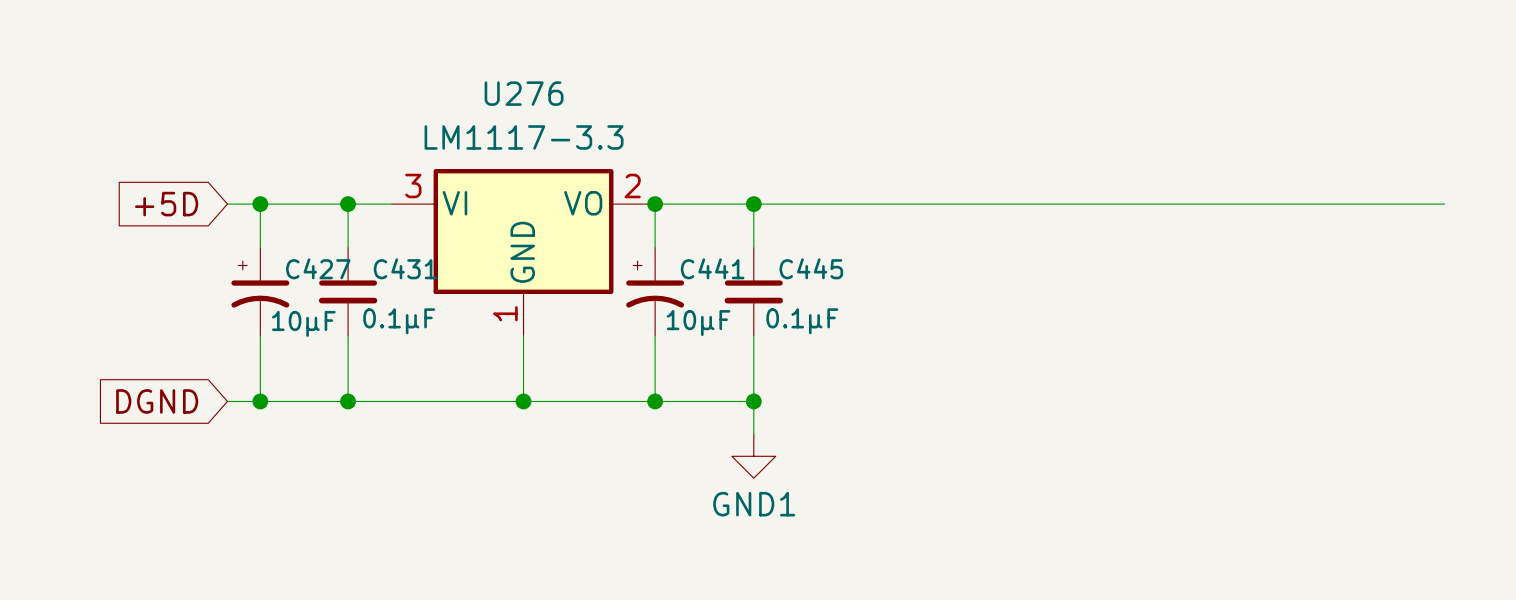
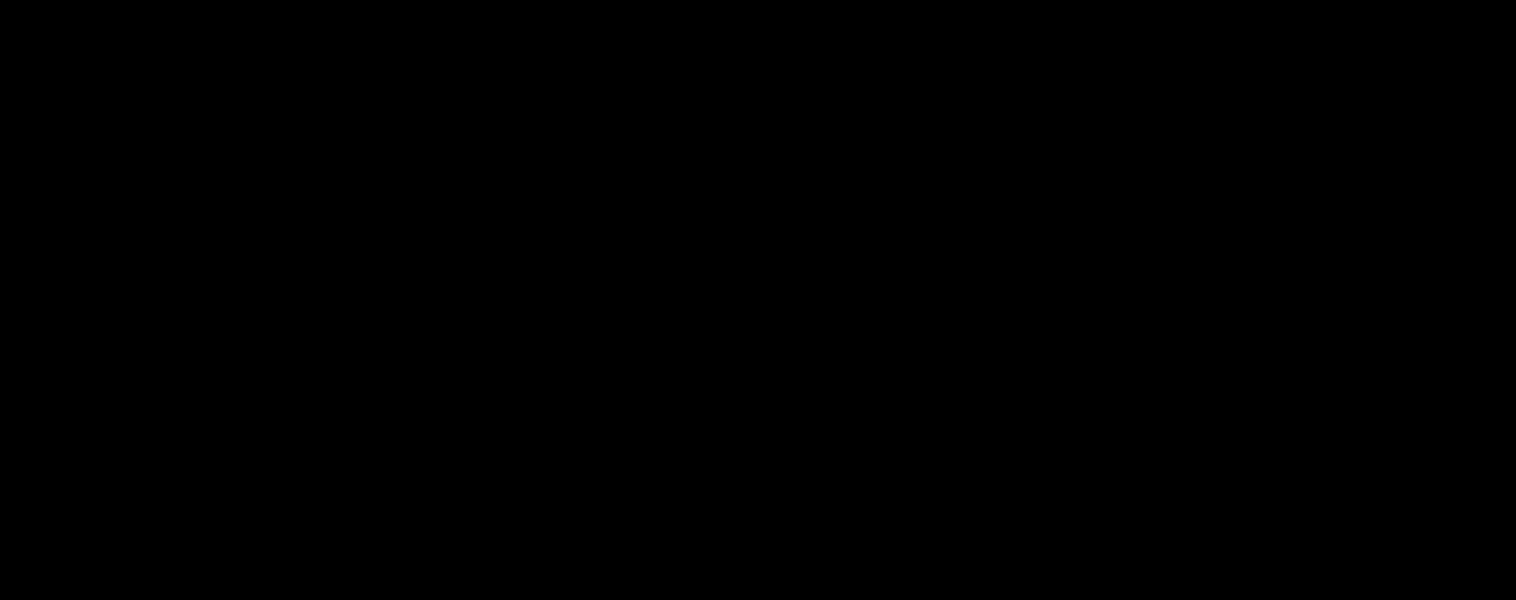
global label: +5D (166, 204) -> none
wire: (227, 204) (391, 204) -> none
wire: (260, 204) (260, 247) -> none
junction: (260, 204) -> none
wire: (348, 204) (348, 247) -> none
junction: (348, 204) -> none
junction: (655, 204) -> none
wire: (753, 204) (753, 247) -> none
junction: (753, 204) -> none
wire: (1444, 204) (655, 204) (655, 247) -> none
U276: LM1117-3.3 (523, 252) -> none
C427: 10µF (260, 291) -> none
C431: 0.1µF (348, 291) -> none
C441: 10µF (655, 291) -> none
C445: 0.1µF (753, 291) -> none
wire: (260, 335) (260, 401) -> none
wire: (348, 335) (348, 401) -> none
wire: (523, 335) (523, 401) -> none
wire: (655, 335) (655, 401) -> none
wire: (753, 335) (753, 434) -> none
global label: DGND (157, 401) -> none
wire: (227, 401) (753, 401) -> none
junction: (260, 401) -> none
junction: (348, 401) -> none
junction: (523, 401) -> none
junction: (655, 401) -> none
junction: (753, 401) -> none
power symbol: GND1 (753, 456) -> none

